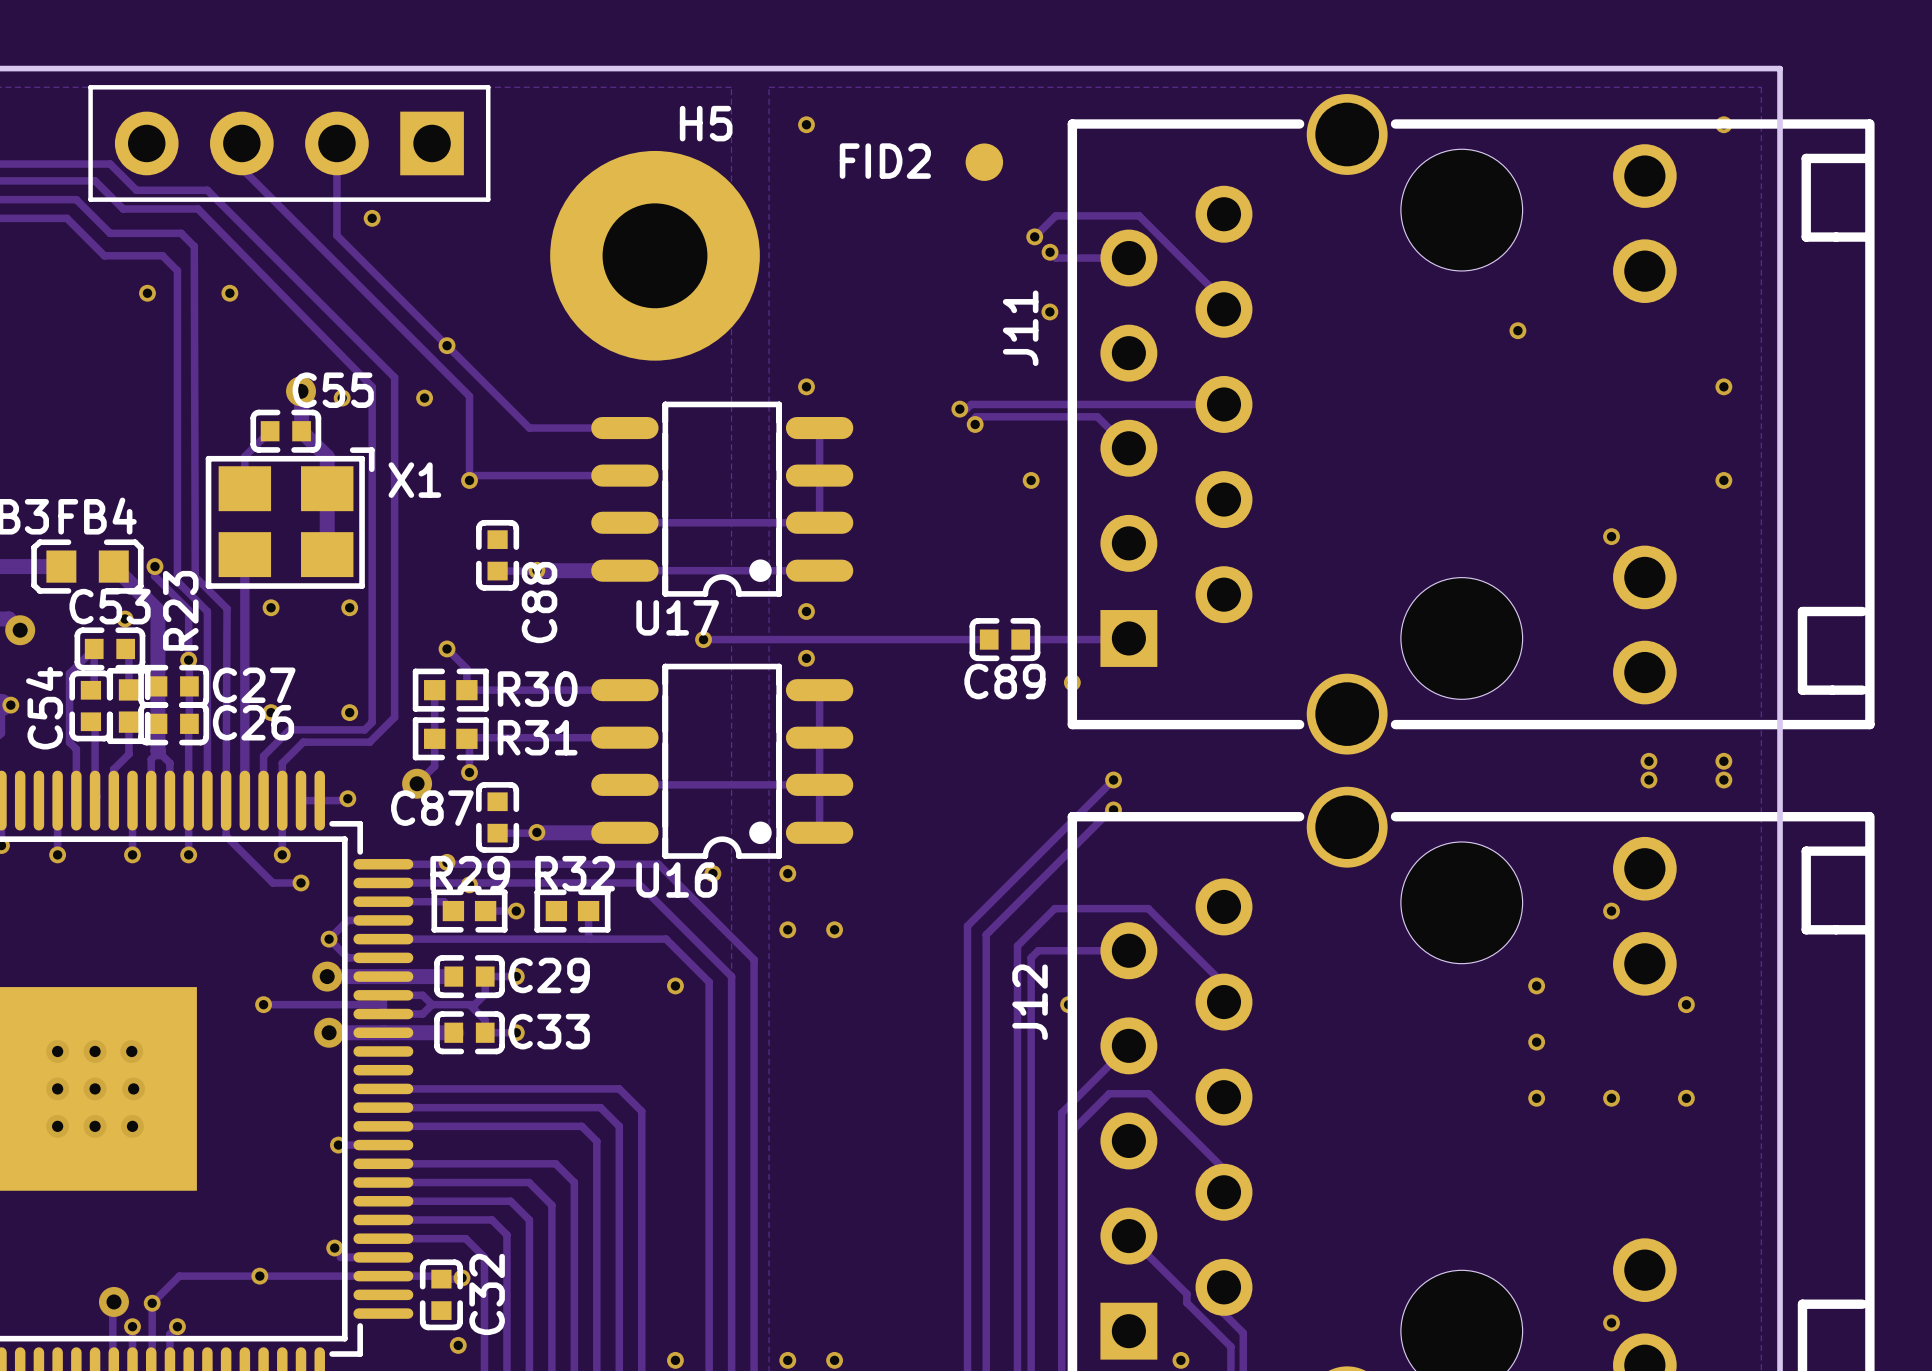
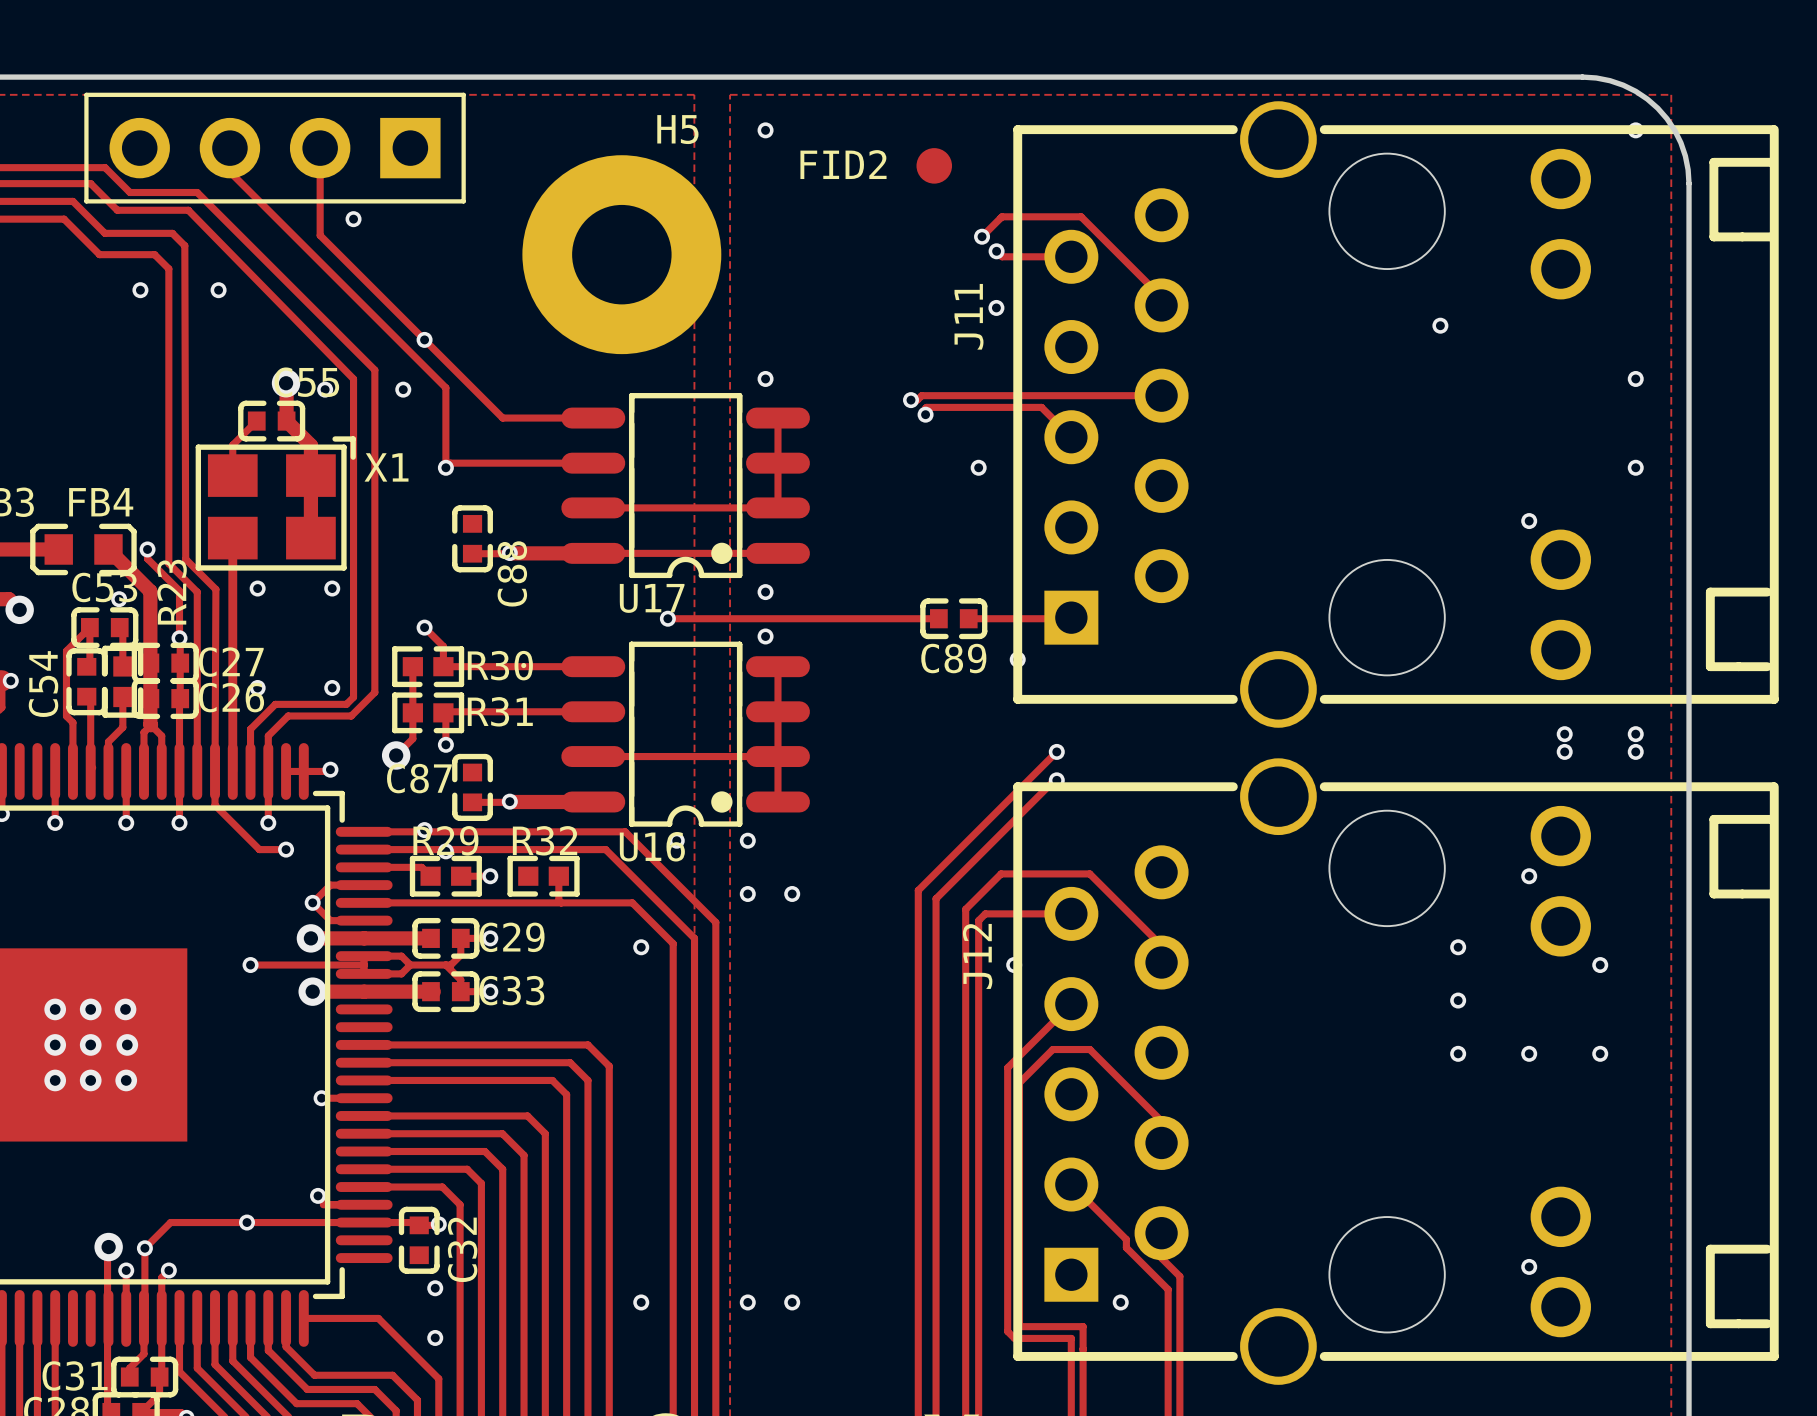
board edge: (1667, 68) (1780, 68) (1780, 180) -> (1582, 77) (1596, 77) (1623, 85) (1647, 99) (1657, 108) (1674, 130) (1680, 142) (1685, 156) (1689, 183)

